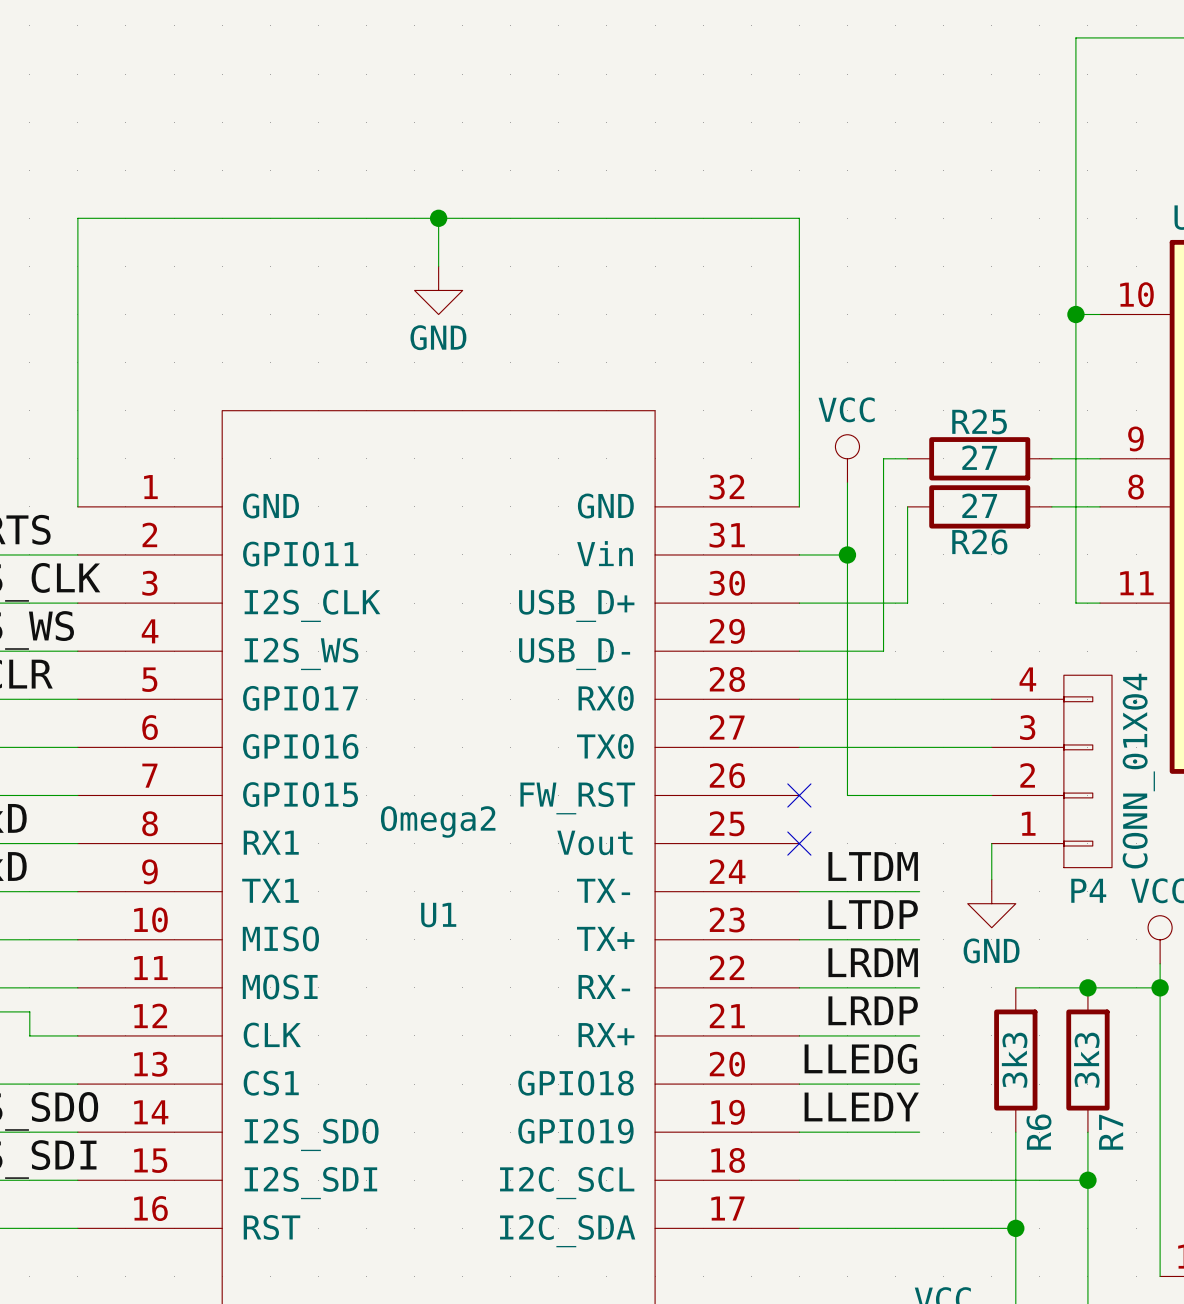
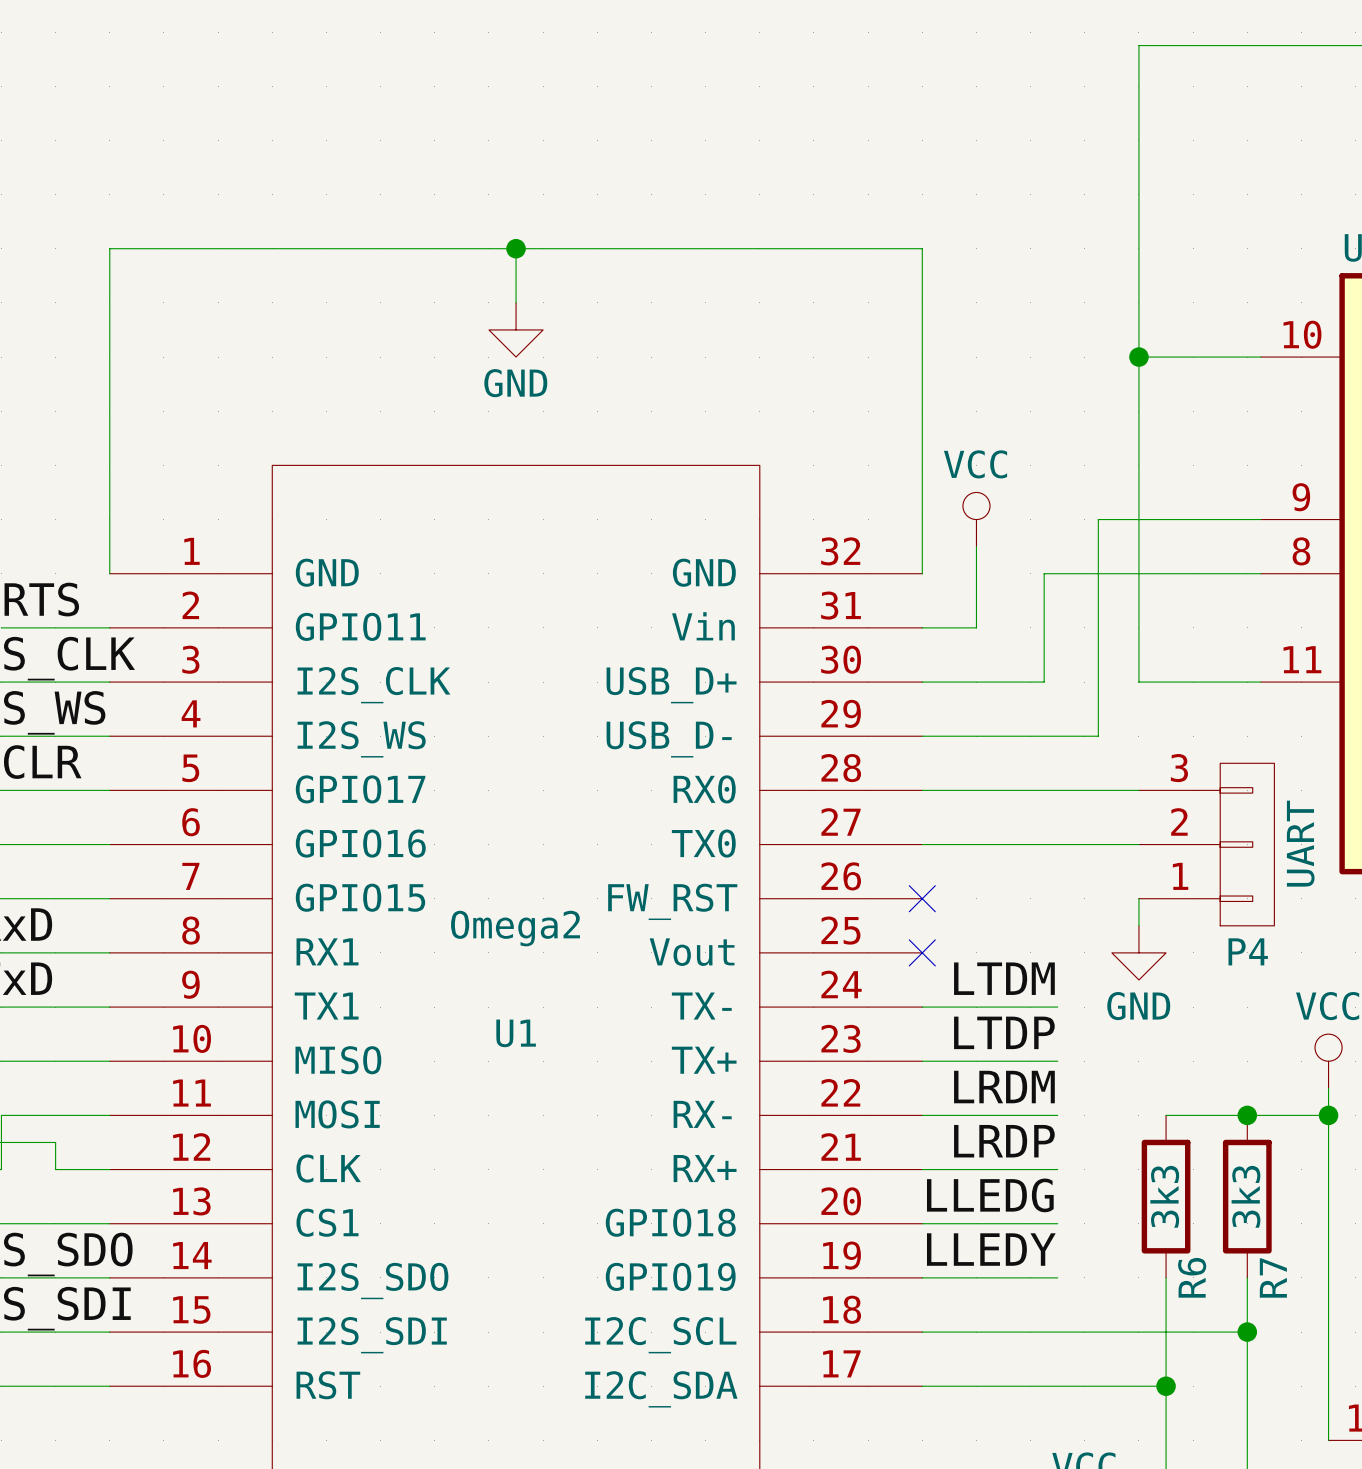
wire: (1075, 37) (1075, 603) -> (1233, 45) (1138, 45) (1138, 682) (1233, 682)
wire: none -> (1138, 357) (1233, 357)
junction position: (1075, 314) -> (1138, 357)
wire: (907, 458) (883, 458) (883, 651) -> (1206, 519) (1098, 519) (1098, 736) (1017, 736)
R25: 27 (979, 458) -> none
wire: none -> (1044, 573) (1206, 573)
R26: 27 (979, 506) -> none
wire: (847, 554) (847, 795) (991, 795) -> (1138, 925) (1138, 898)
junction: (847, 554) -> none
P4 symbol: [991, 675, 1113, 868] -> [1138, 763, 1275, 926]
P4 value: CONN_01X04 (1138, 771) -> UART (1300, 843)
wire: (991, 843) (991, 879) -> none
label position: LTDM (873, 866) -> LTDM (1004, 978)
power symbol position: GND (991, 903) -> GND (1138, 952)
label position: LTDP (873, 914) -> LTDP (1004, 1032)
label position: LRDM (873, 962) -> LRDM (1004, 1087)
label position: LRDP (873, 1010) -> LRDP (1004, 1141)
label position: LLEDG (860, 1058) -> LLEDG (990, 1195)
label position: LLEDY (861, 1106) -> LLEDY (991, 1249)

